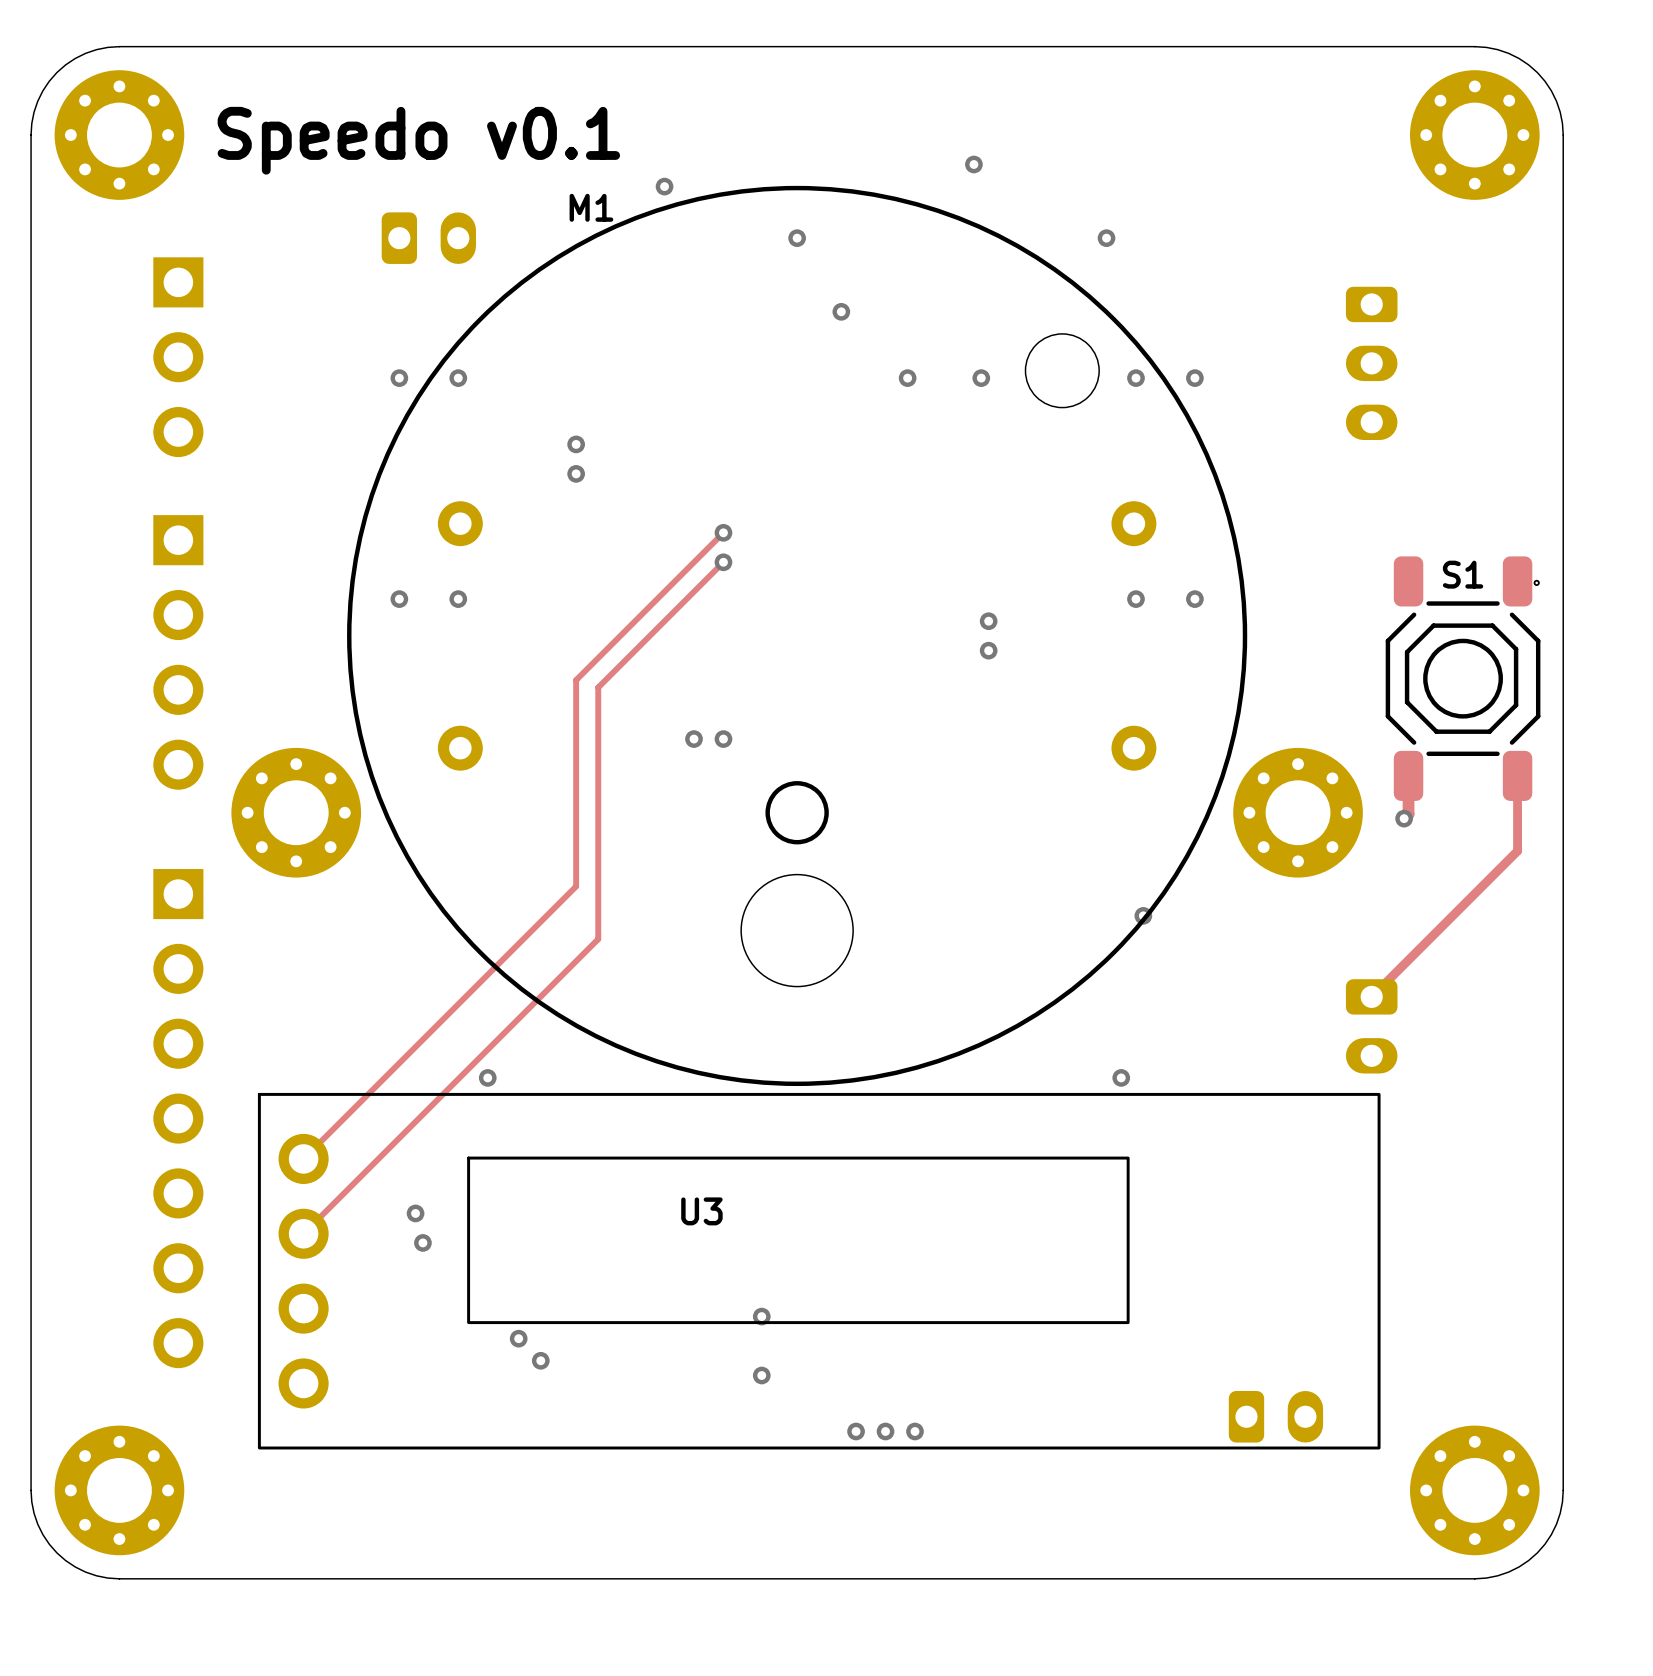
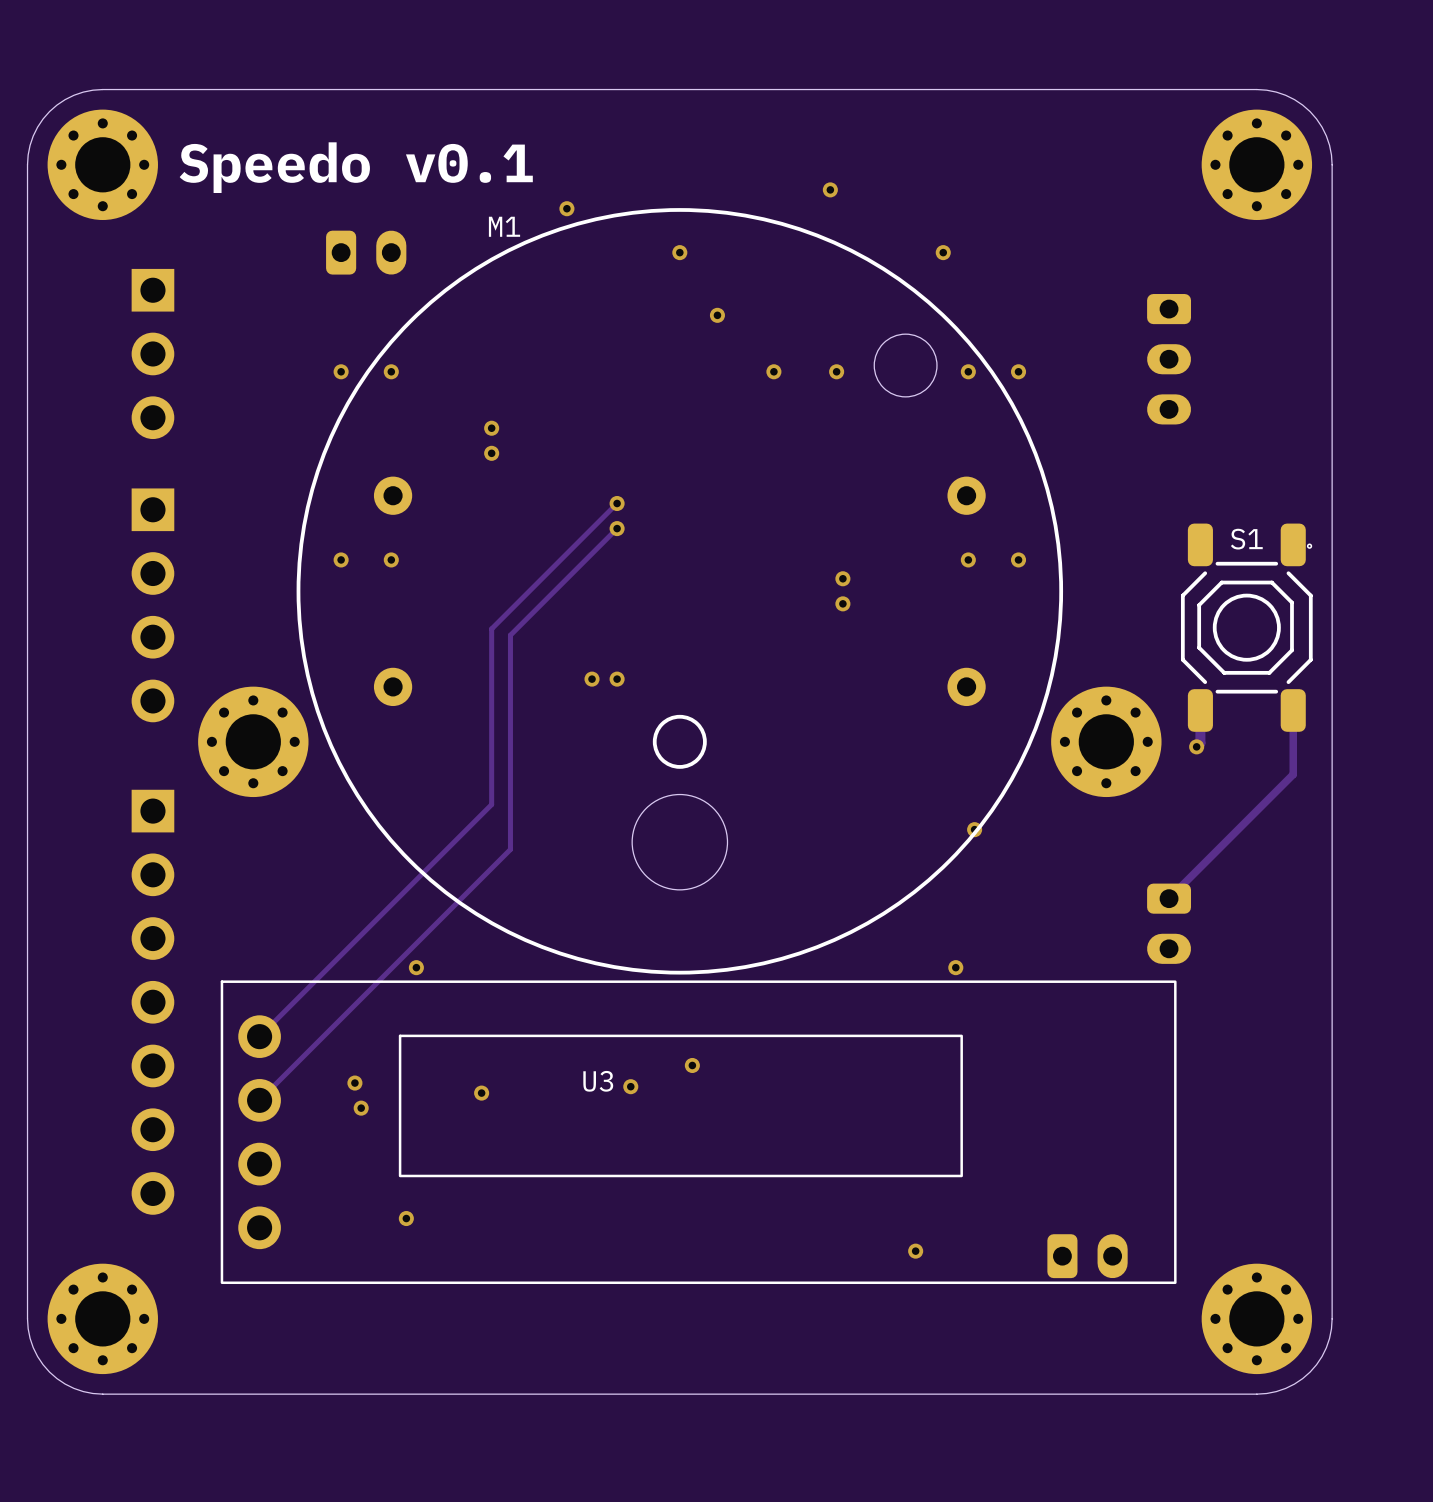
via: none -> (692, 1065)
via: none -> (630, 1086)
via: none -> (481, 1093)
via: (761, 1316) -> none
via: (518, 1338) -> none
via: (540, 1360) -> none
via: none -> (406, 1218)
via: (761, 1375) -> none
via: none -> (915, 1251)
via: (856, 1431) -> none
via: (885, 1431) -> none
via: (914, 1431) -> none

